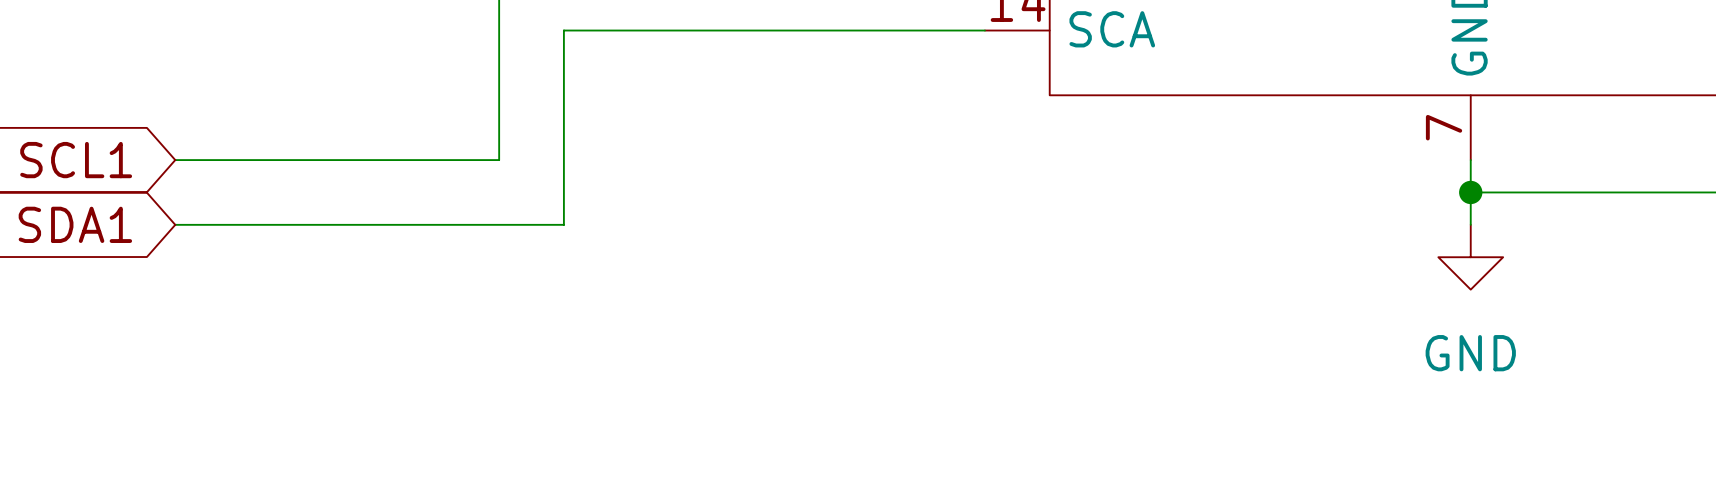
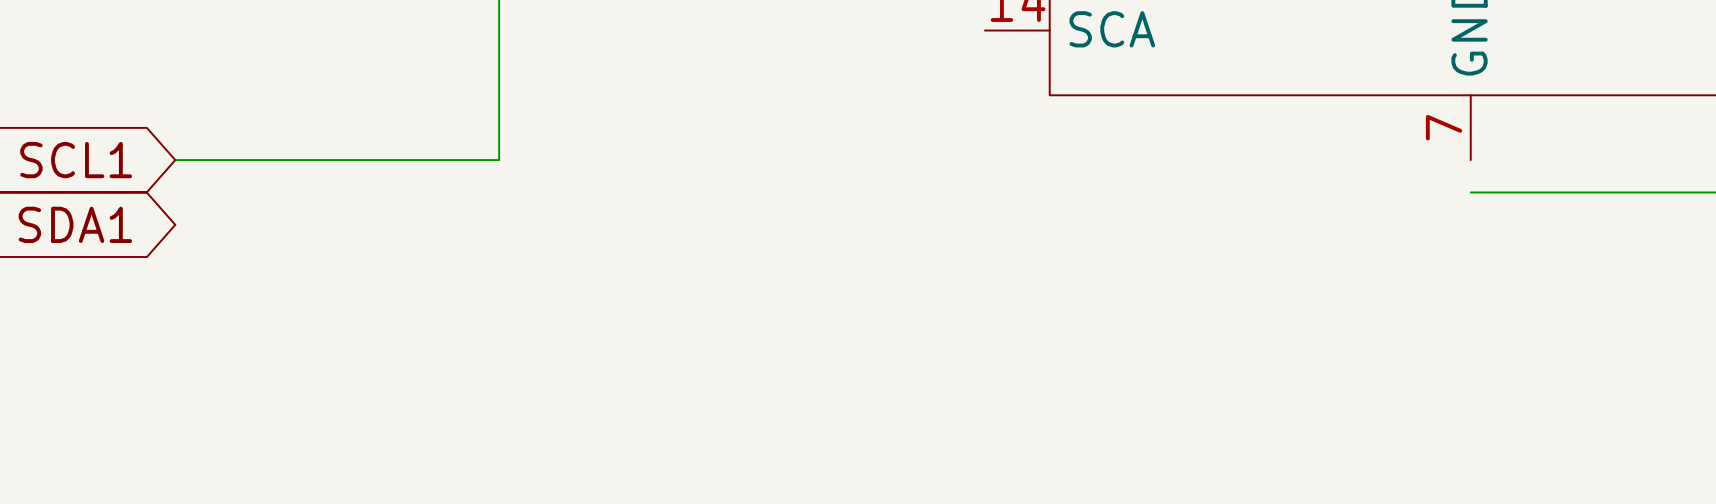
wire: (984, 30) (563, 30) (563, 224) (175, 224) -> none
wire: (1470, 160) (1470, 224) -> none
junction: (1470, 192) -> none
power symbol: GND (1470, 257) -> none

